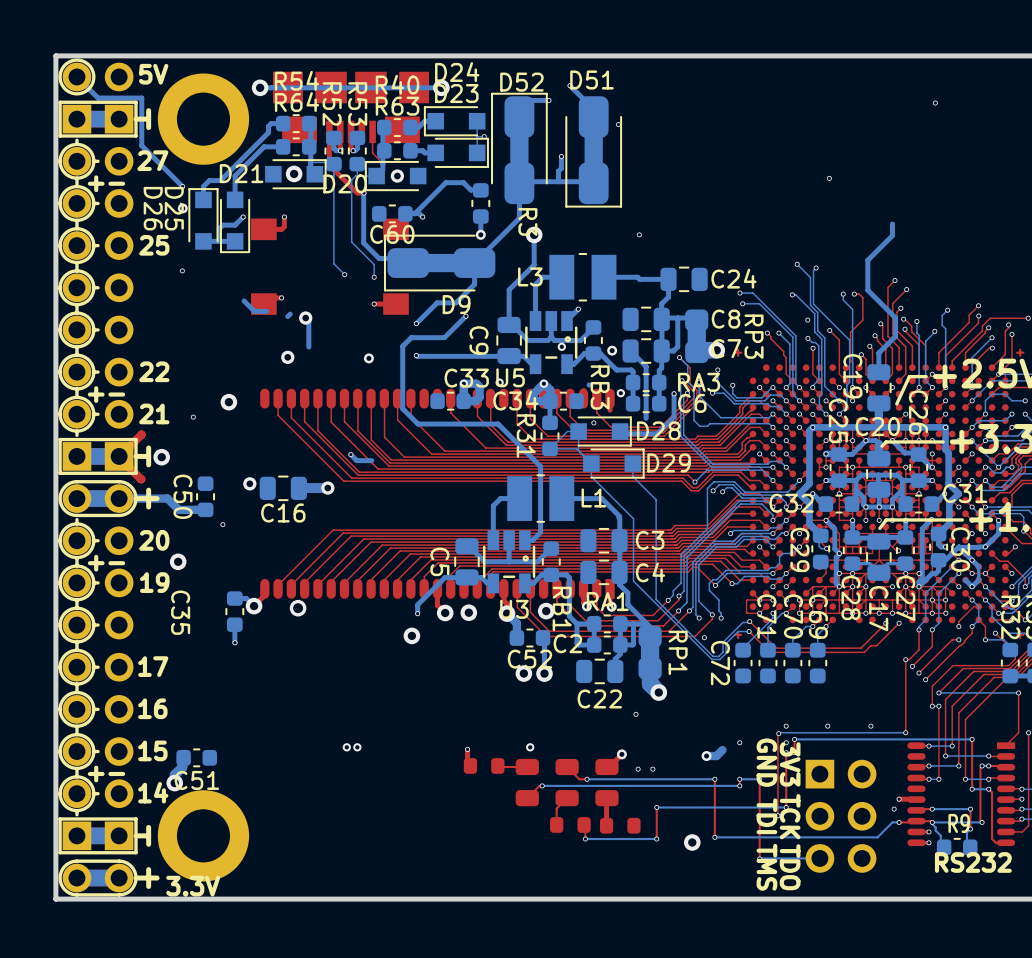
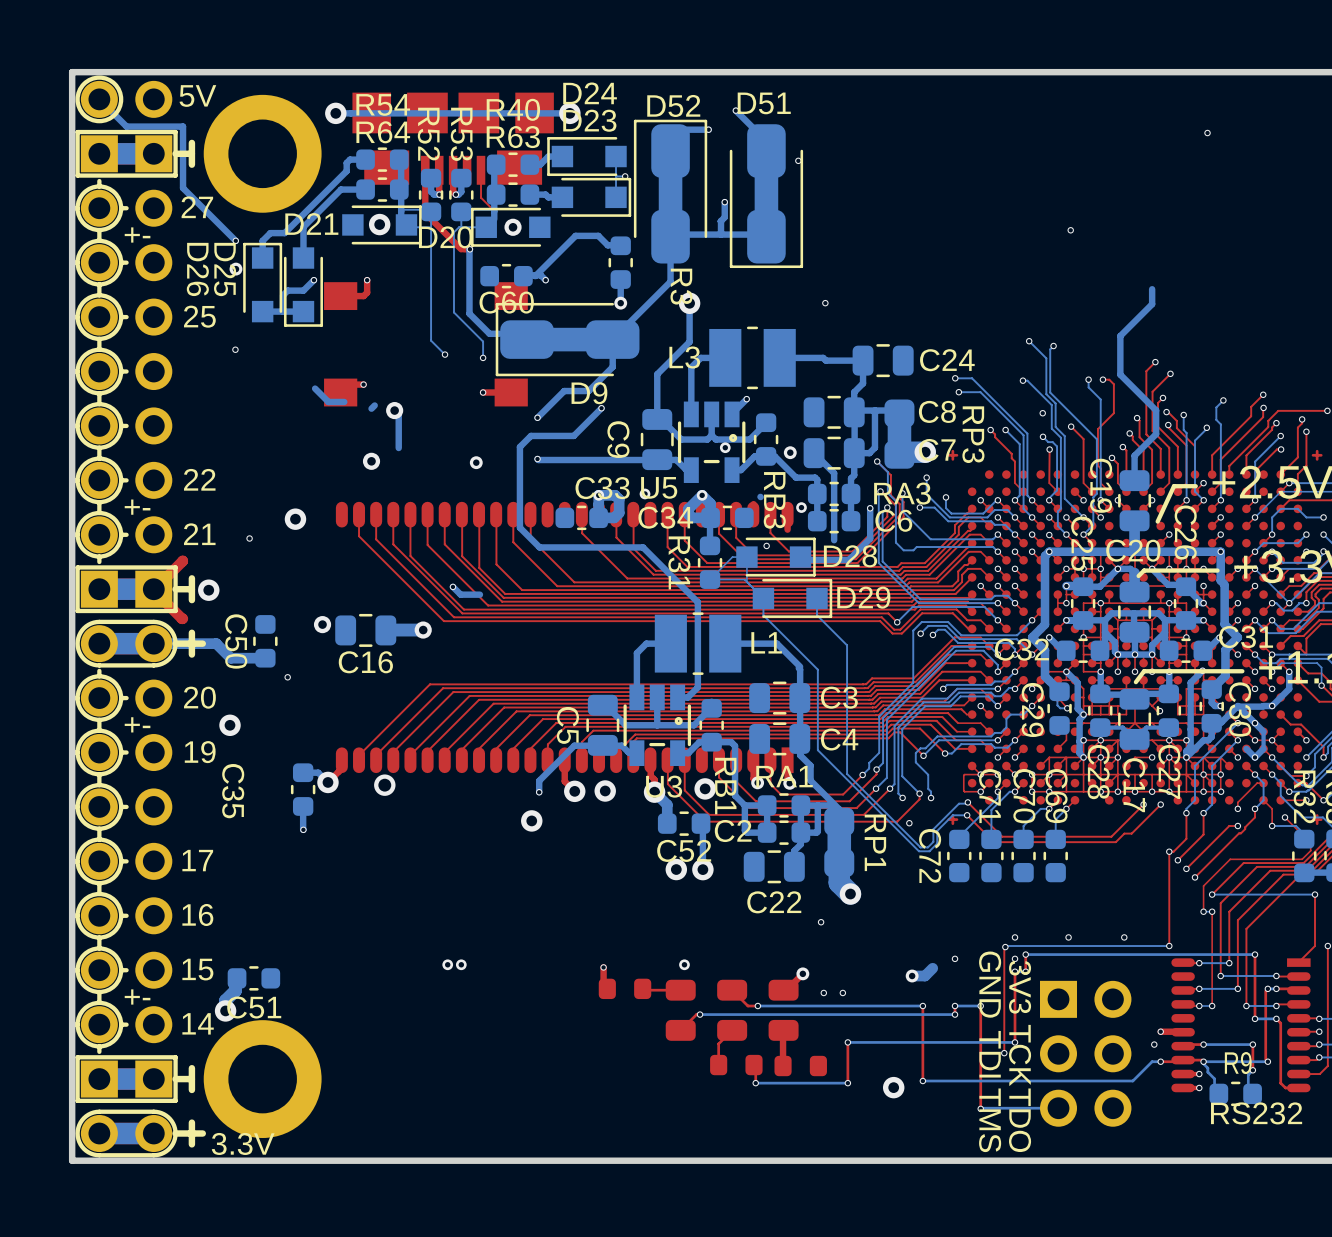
top track: (1015, 546) (1008, 553) (1005, 553) -> none
via: (1015, 546) -> none

